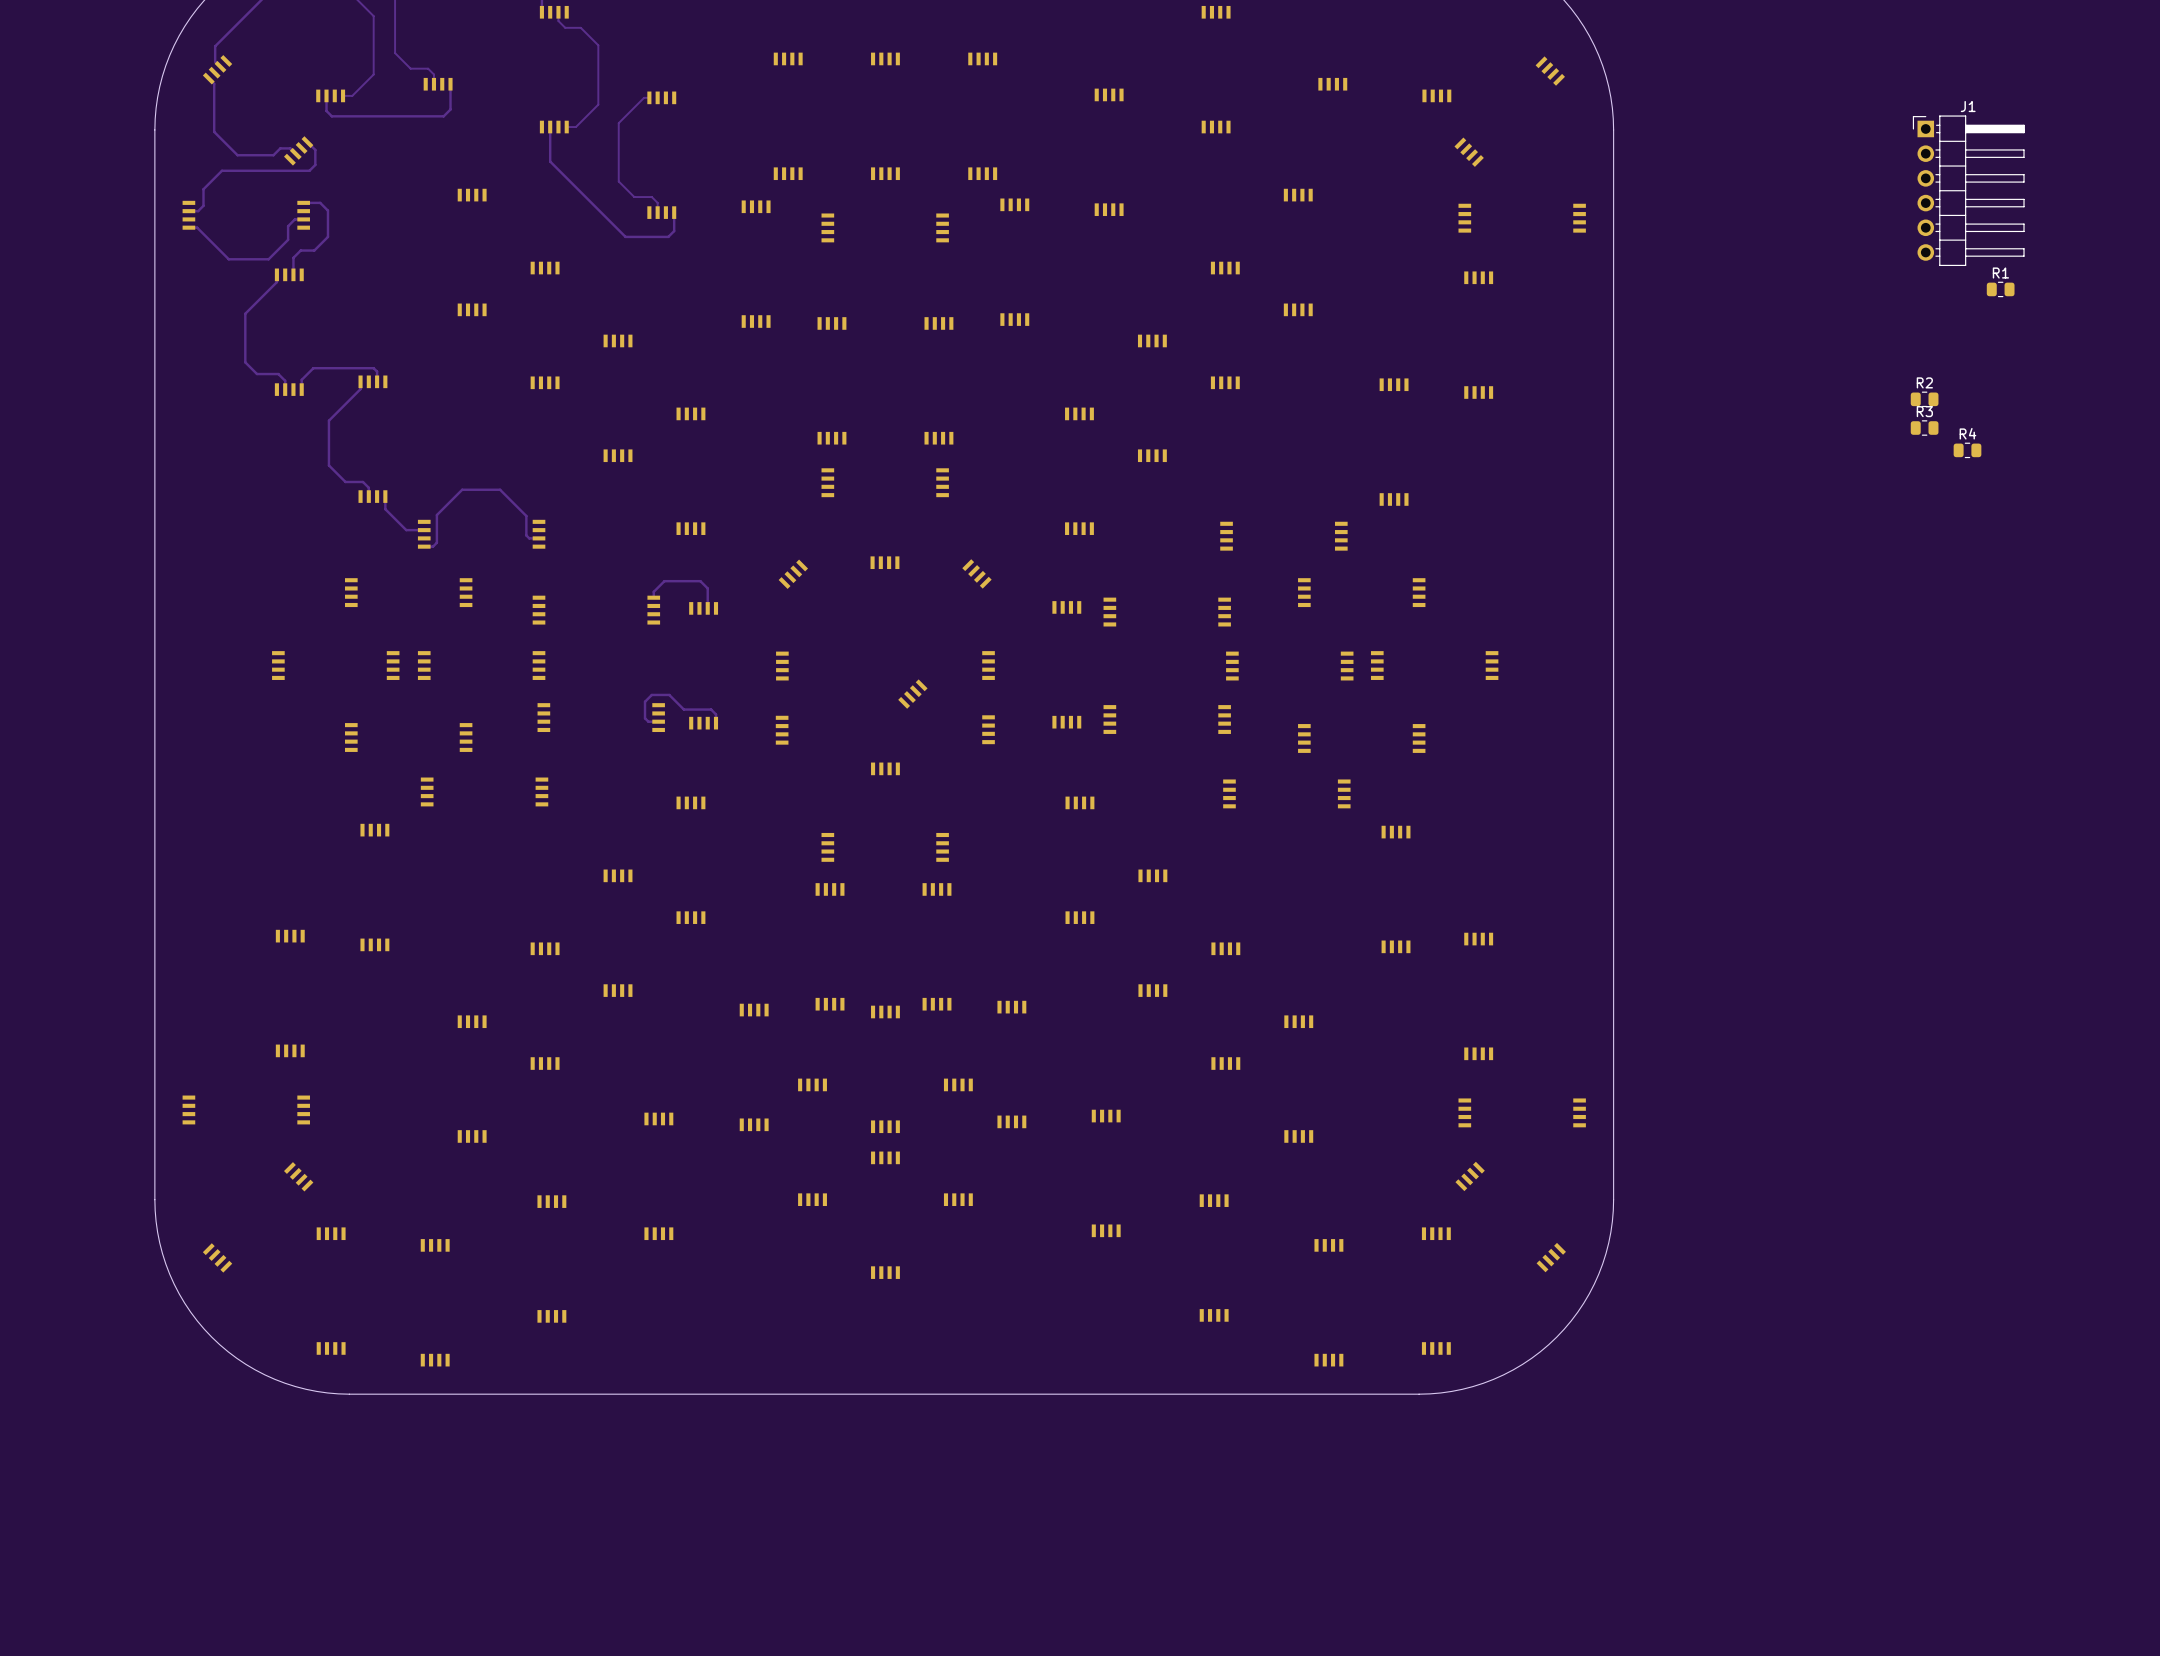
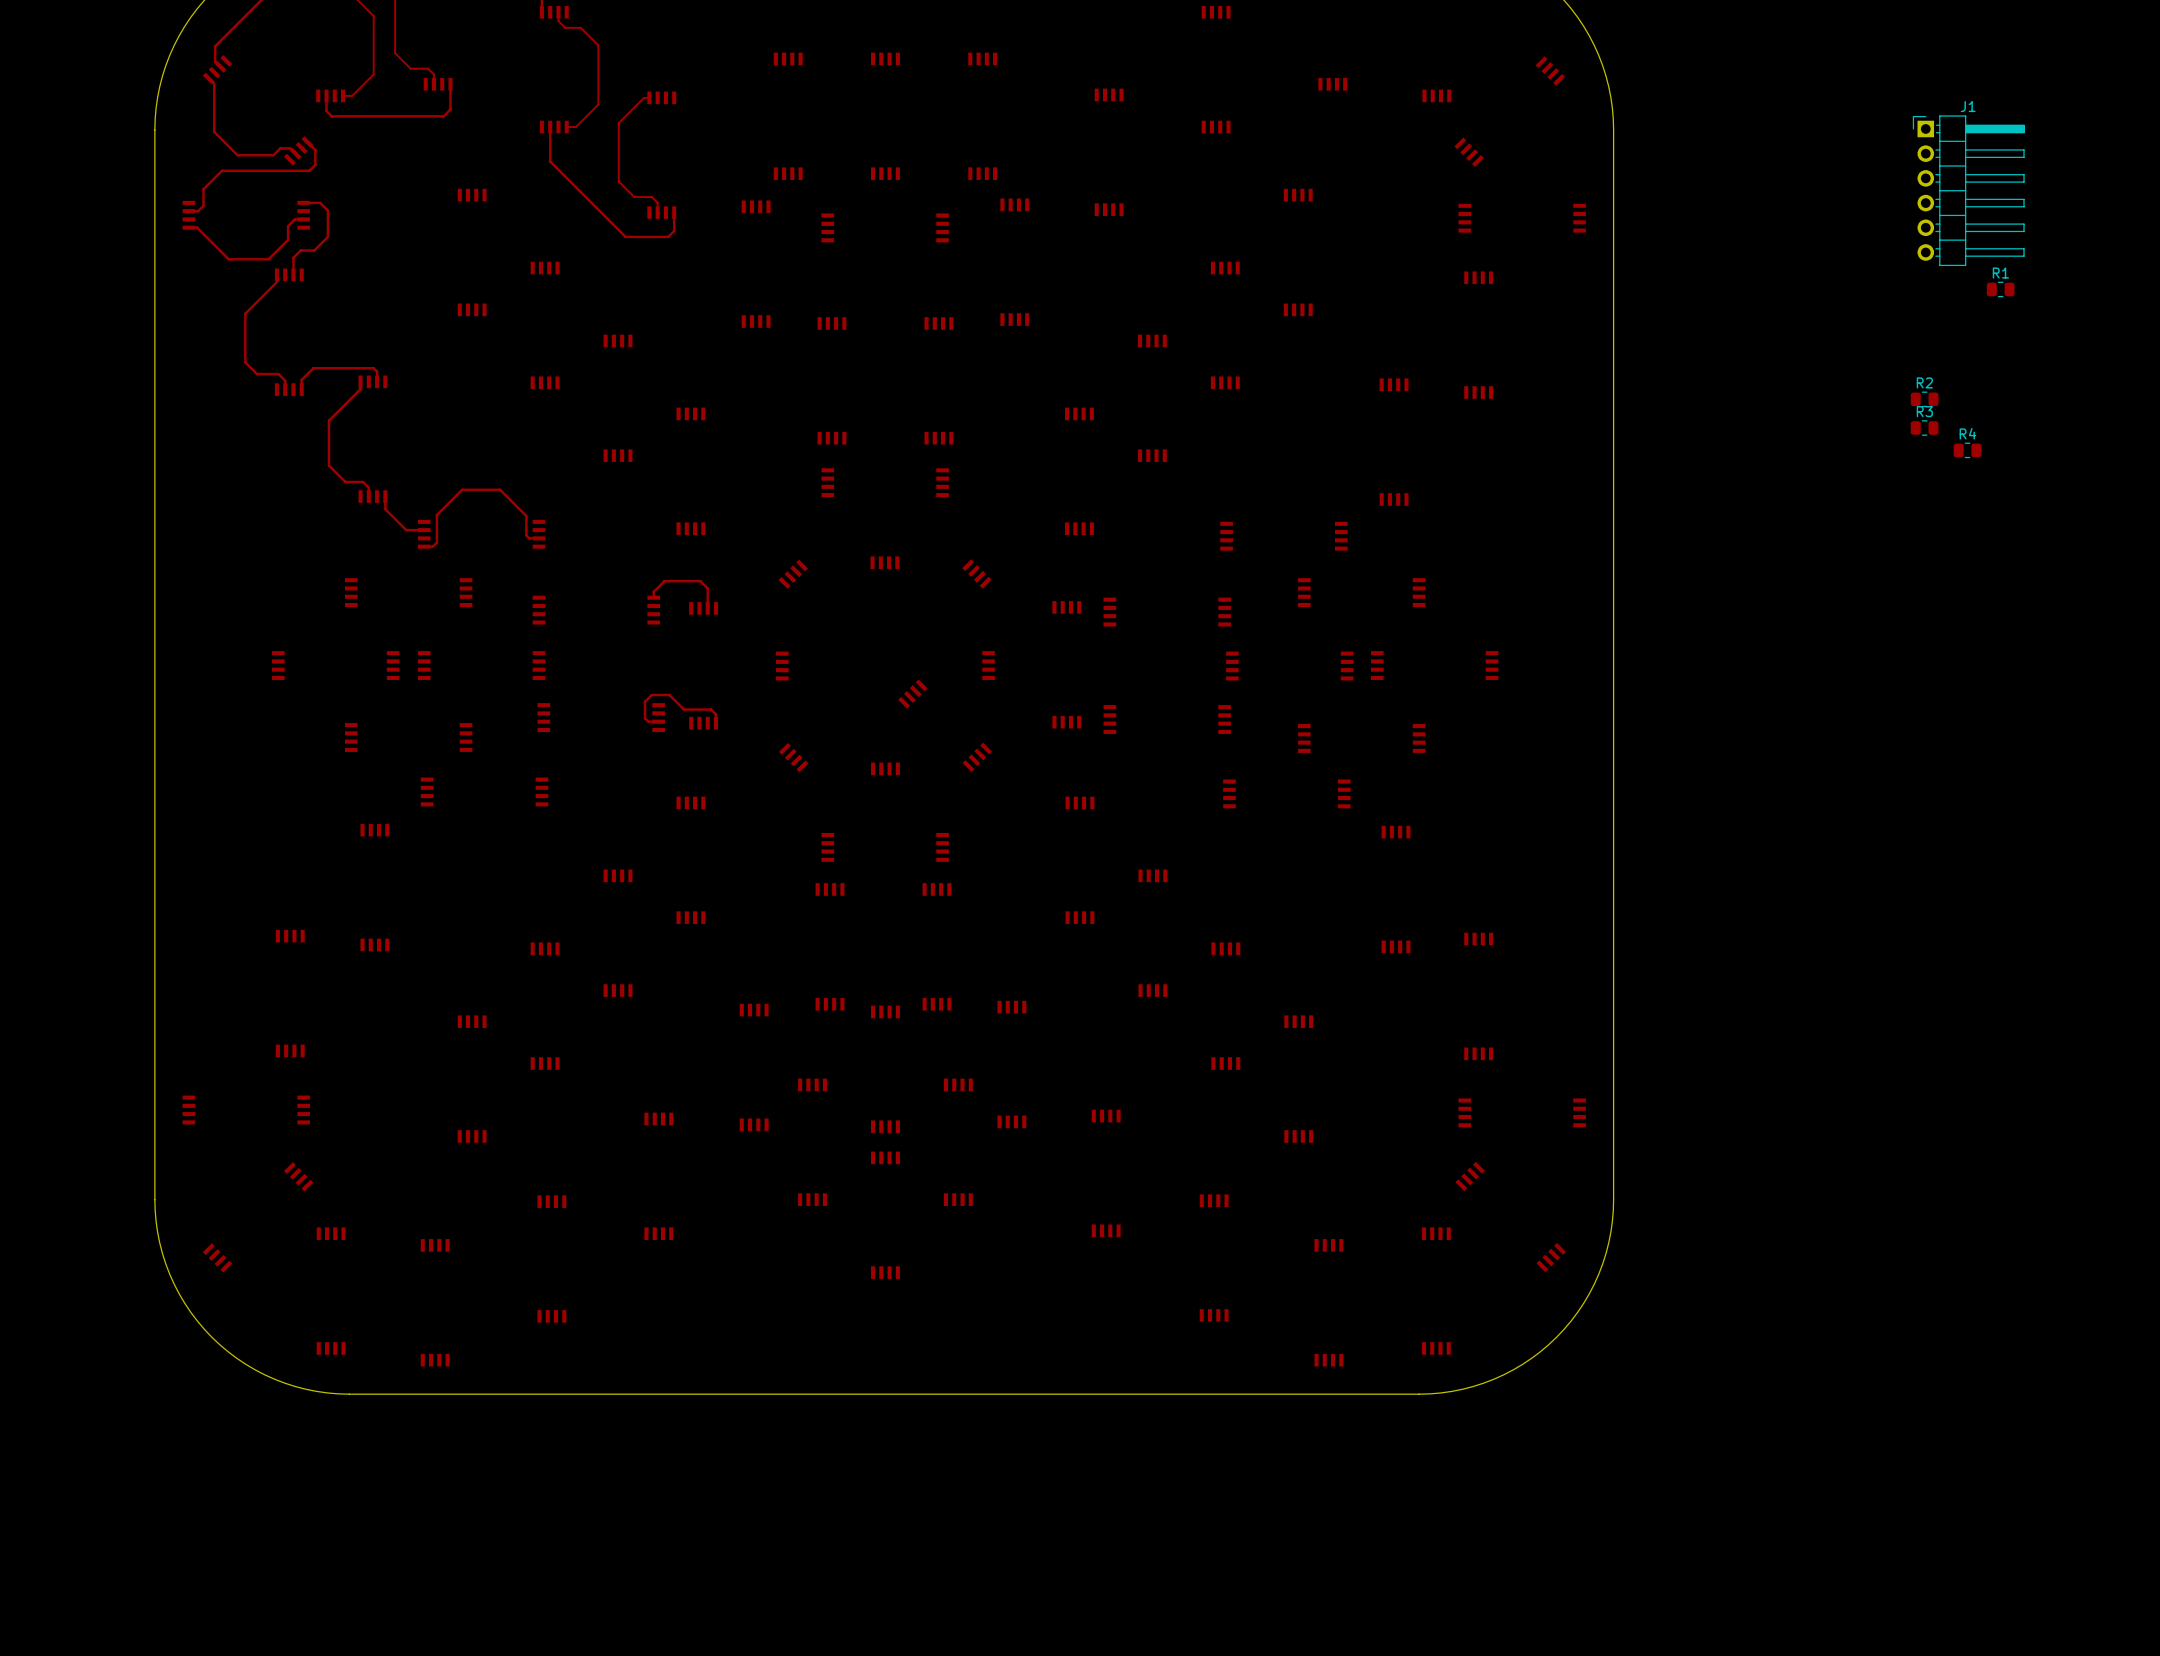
part: (988, 729) -> none
part: (782, 730) -> none
part: none -> (793, 757)
part: none -> (977, 757)

